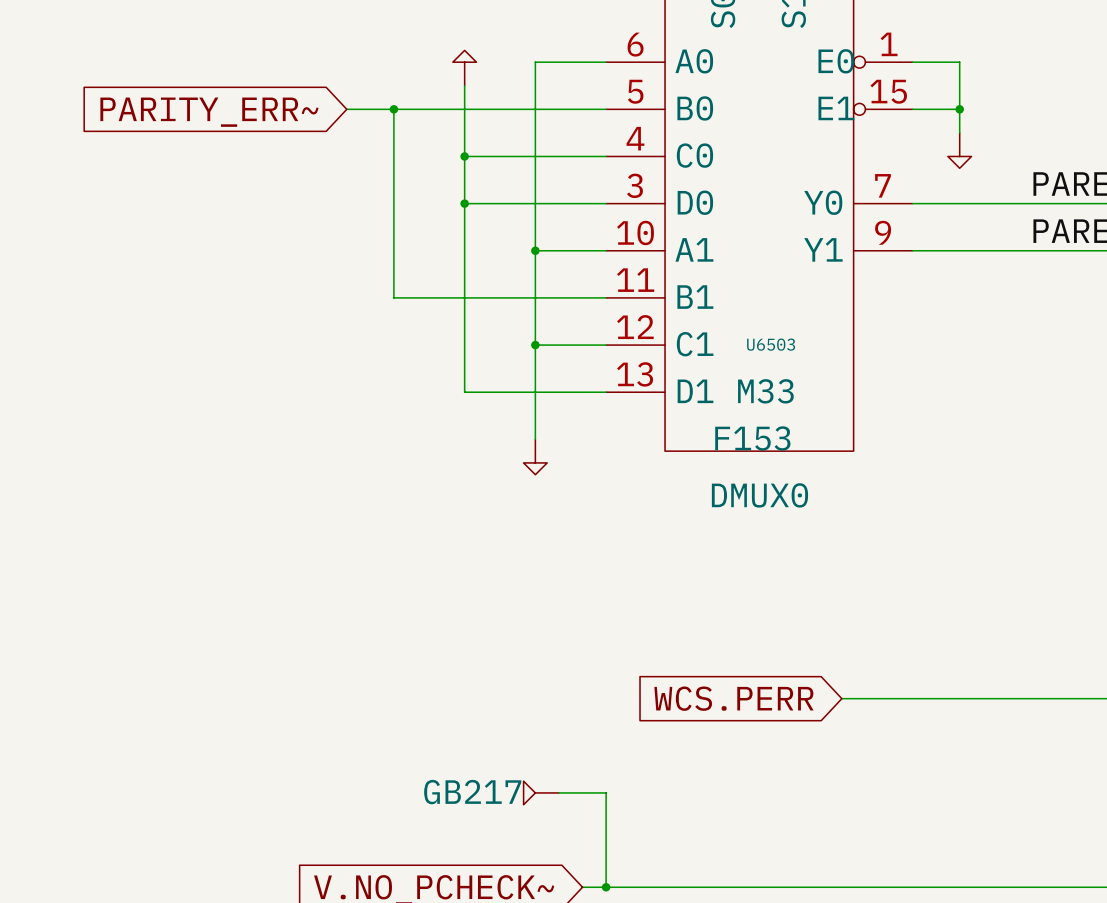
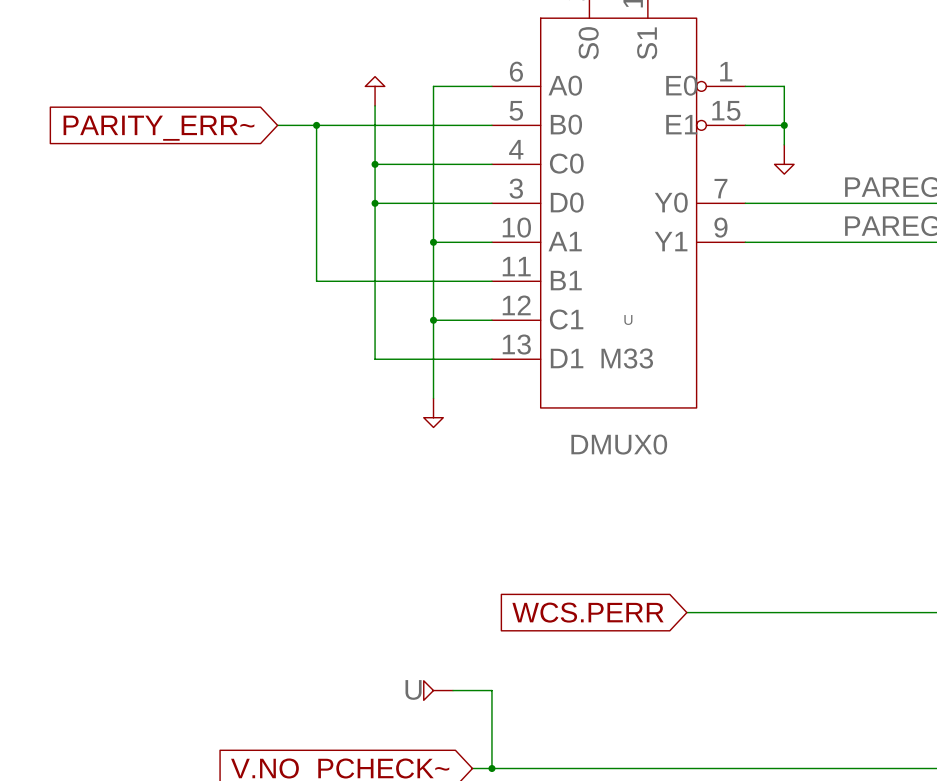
U6503 name: U6503 (771, 344) -> U (628, 319)
U6503 value: F153 (752, 438) -> none
GB217 name: GB217 (472, 792) -> U (413, 689)

